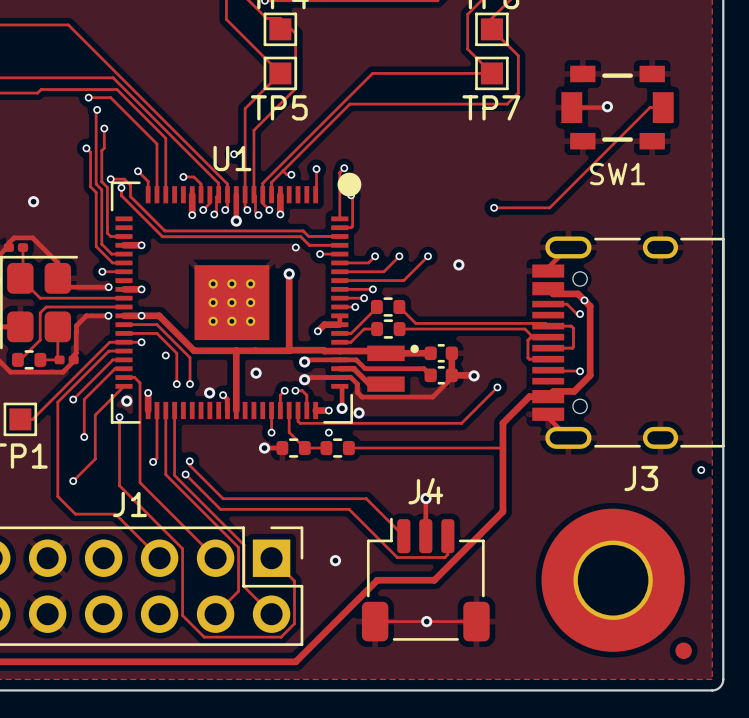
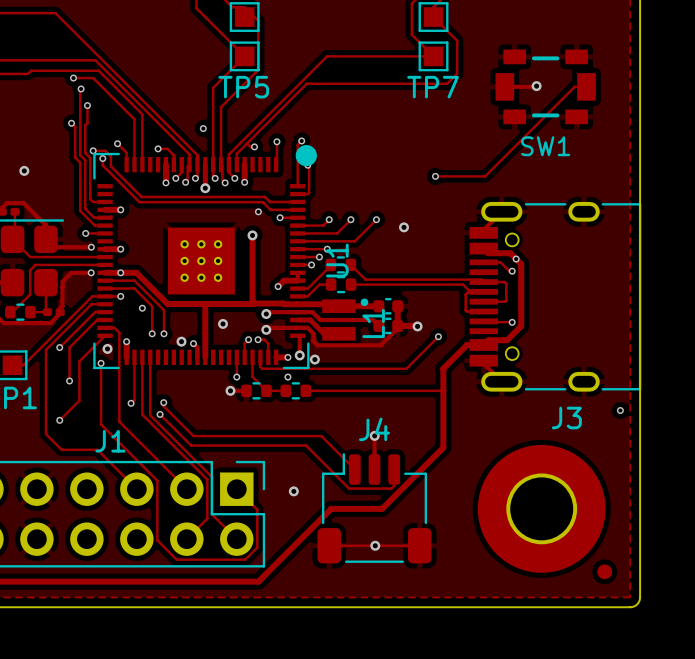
U1 name rotation: 0° (232, 158) -> 90° counterclockwise (337, 260)
U1 name position: U1 (232, 158) -> U1 (337, 260)
L1 name: none -> L1 (373, 323)

